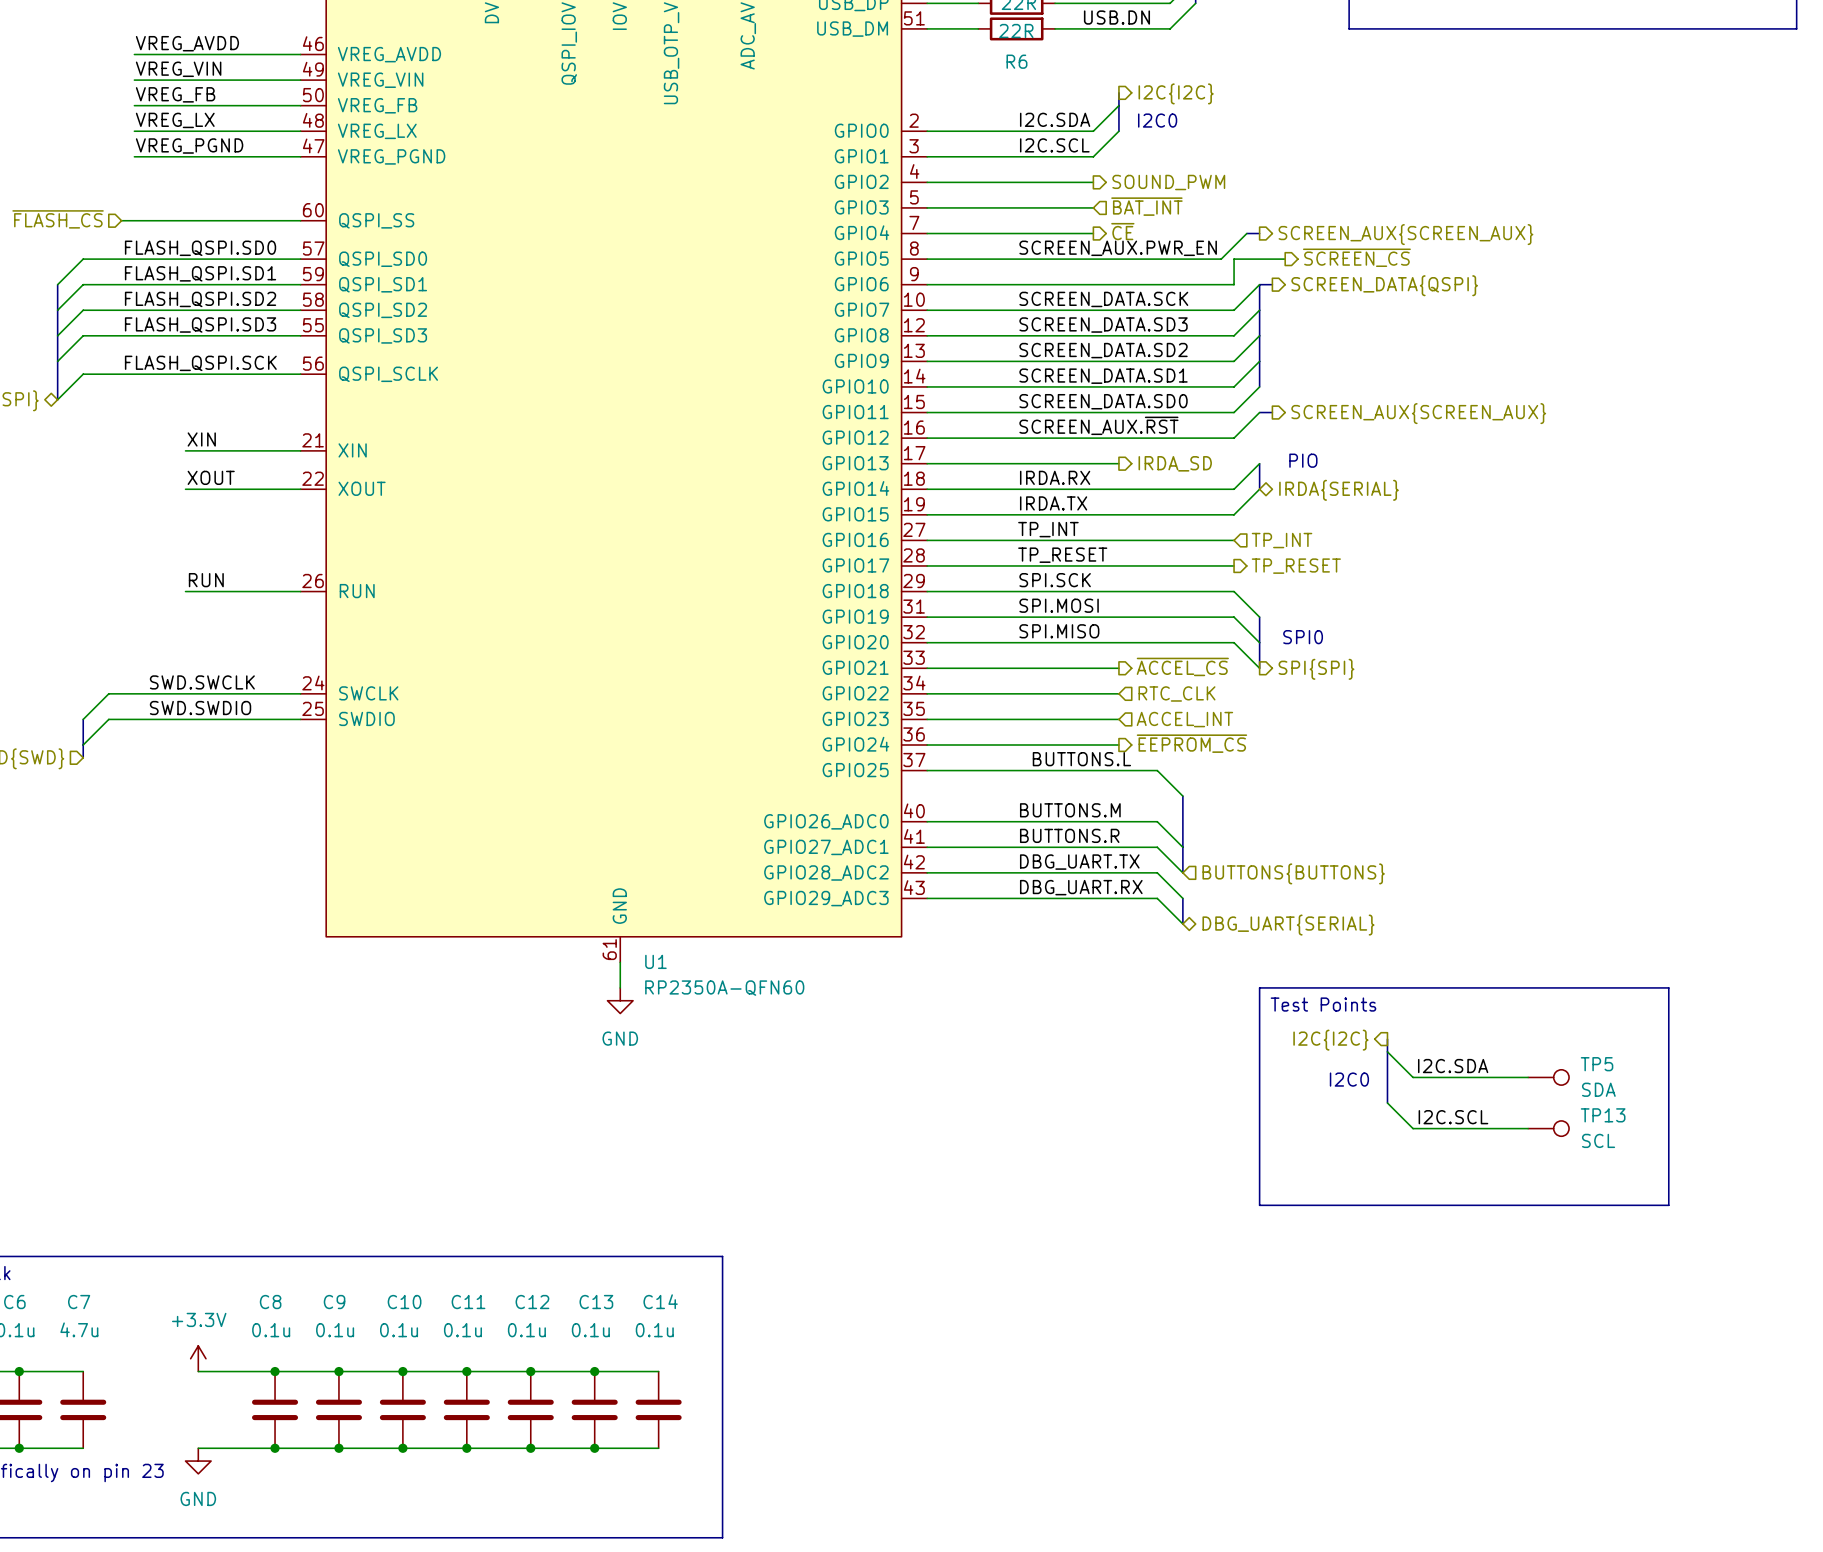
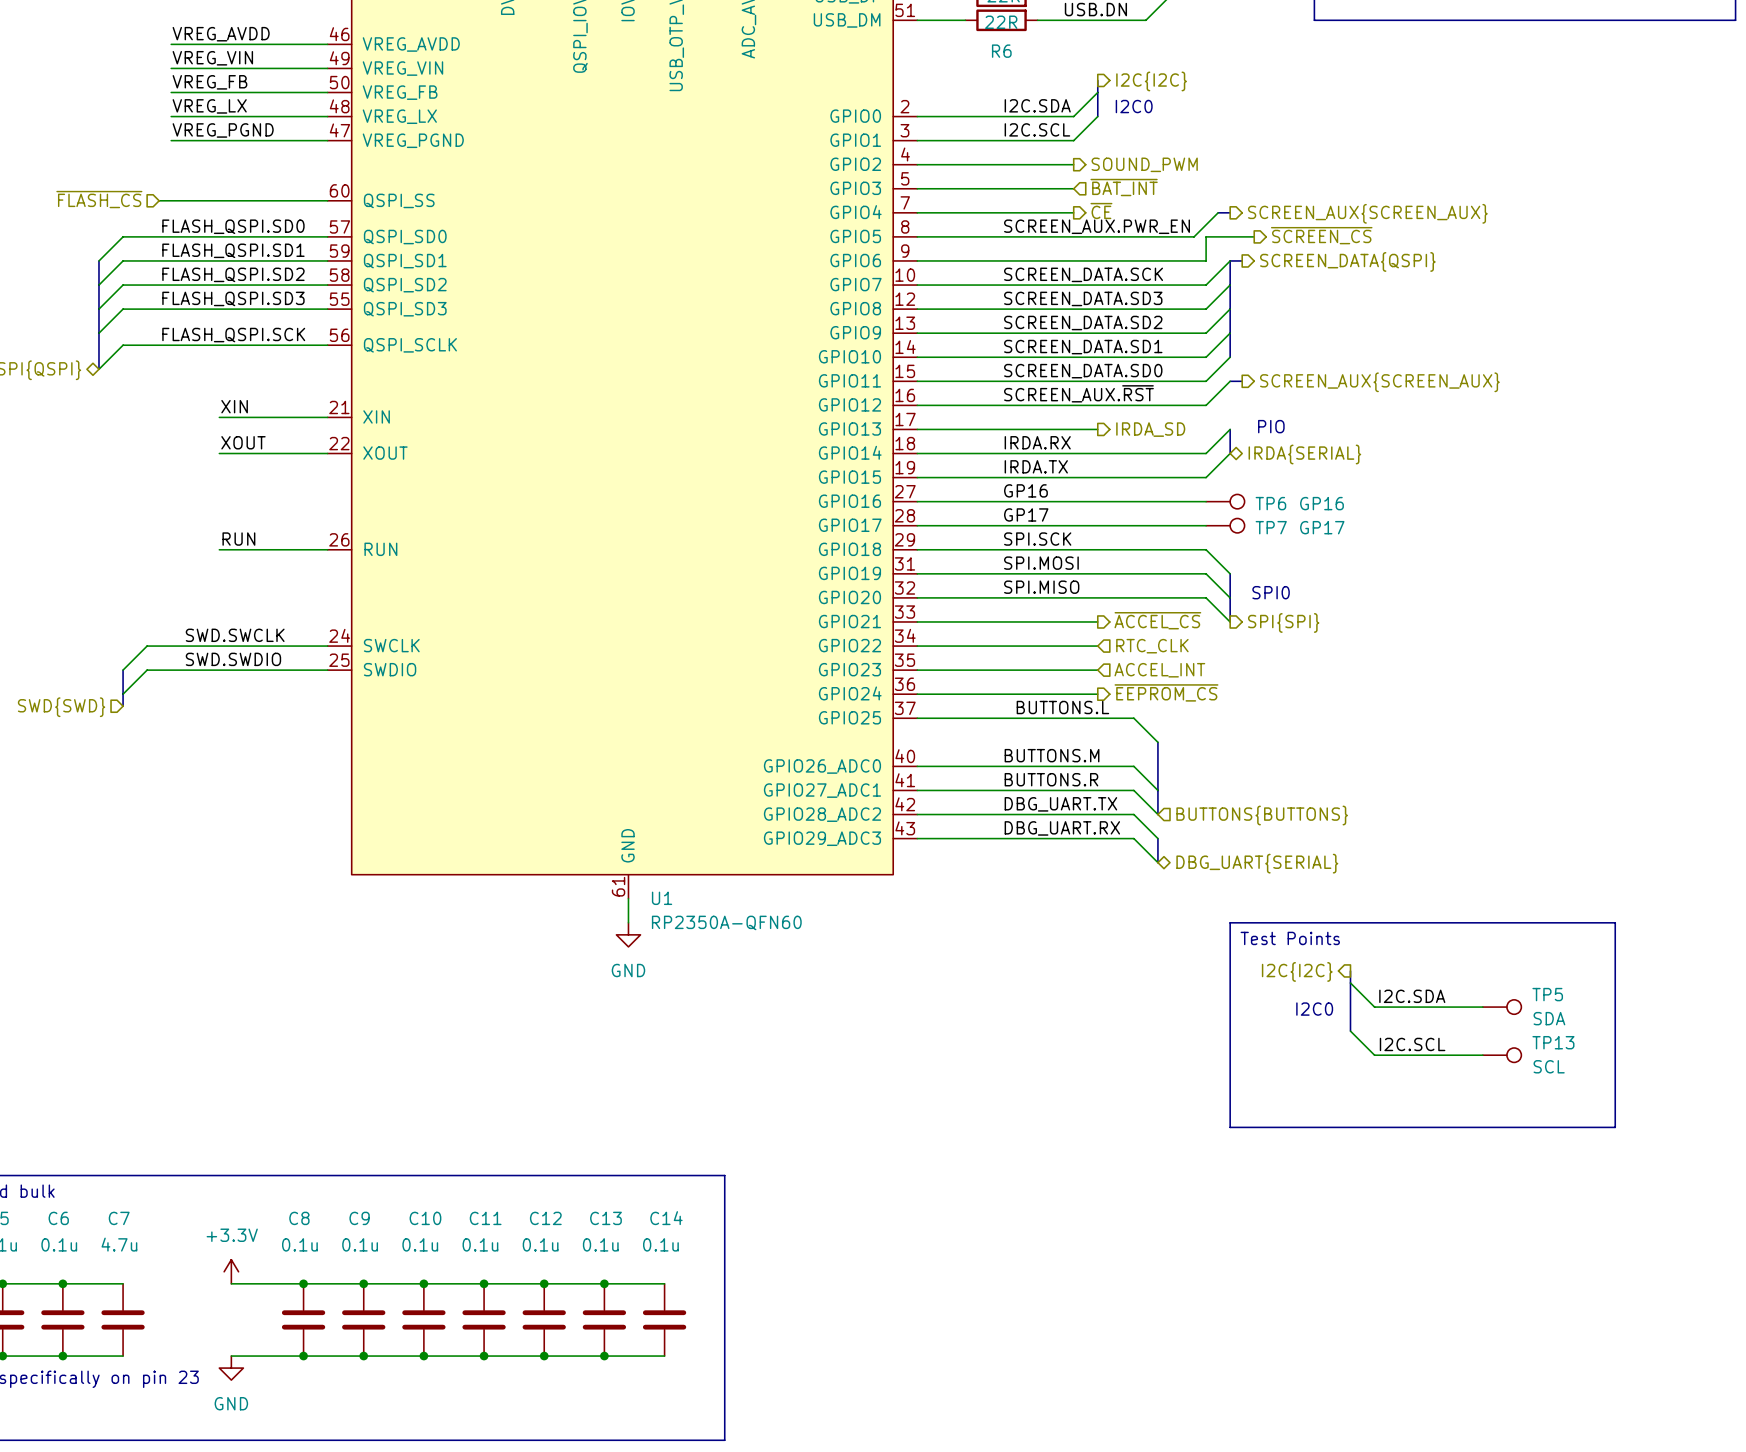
label: TP_INT (1048, 529) -> GP16 (1025, 490)
TP6: none -> GP16 (1225, 501)
hierarchical label: TP_INT (1282, 540) -> none
label: TP_RESET (1062, 555) -> GP17 (1026, 514)
TP7: none -> GP17 (1225, 525)
hierarchical label: TP_RESET (1296, 566) -> none

